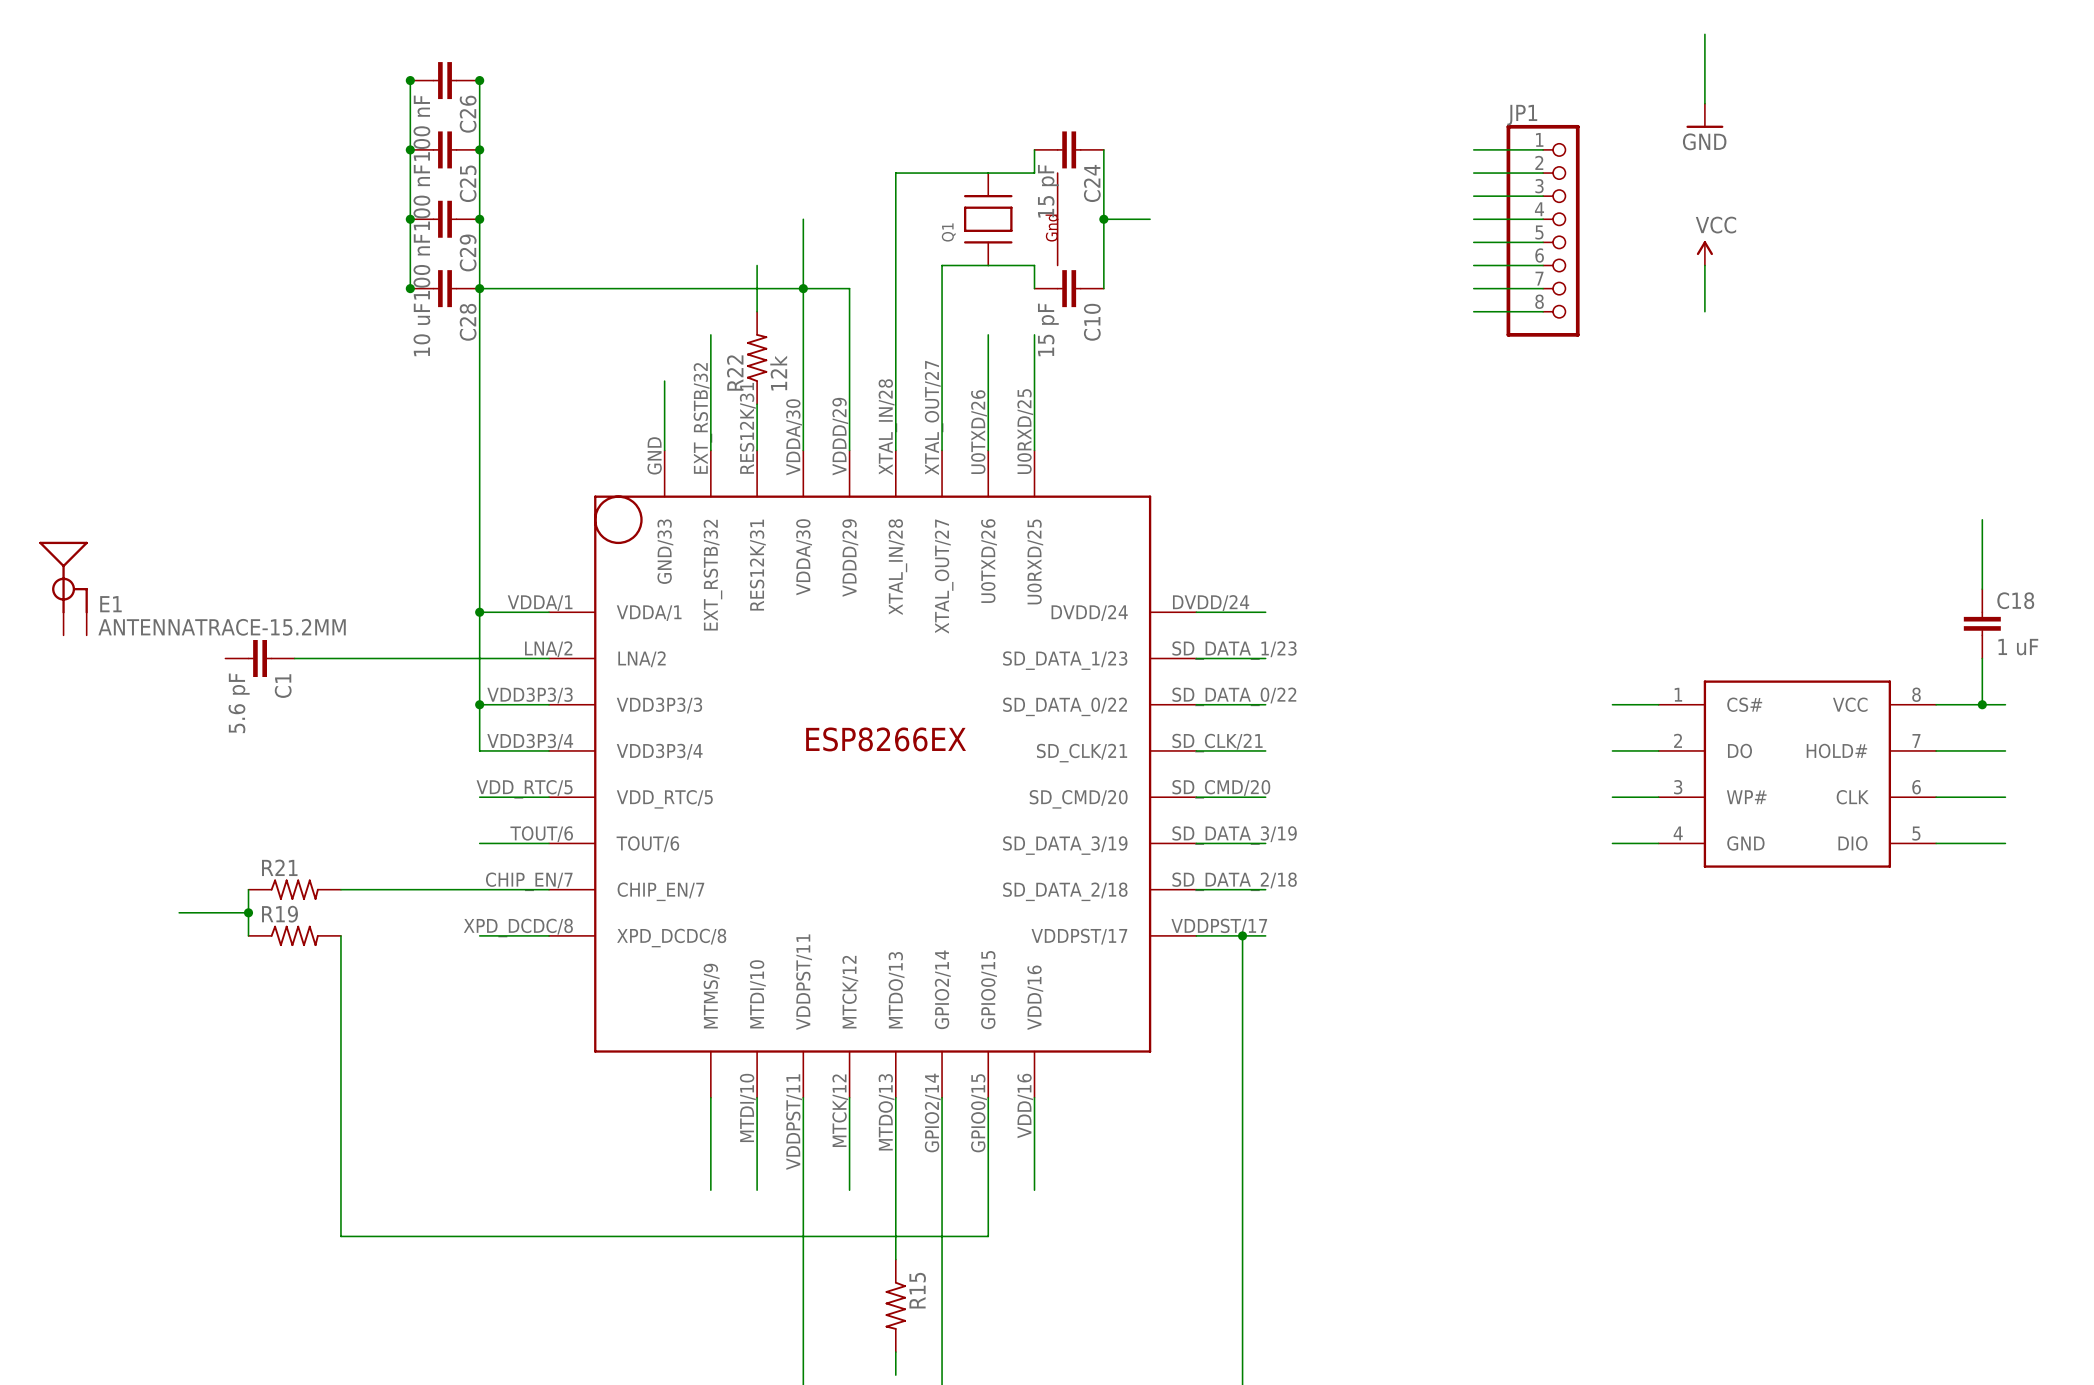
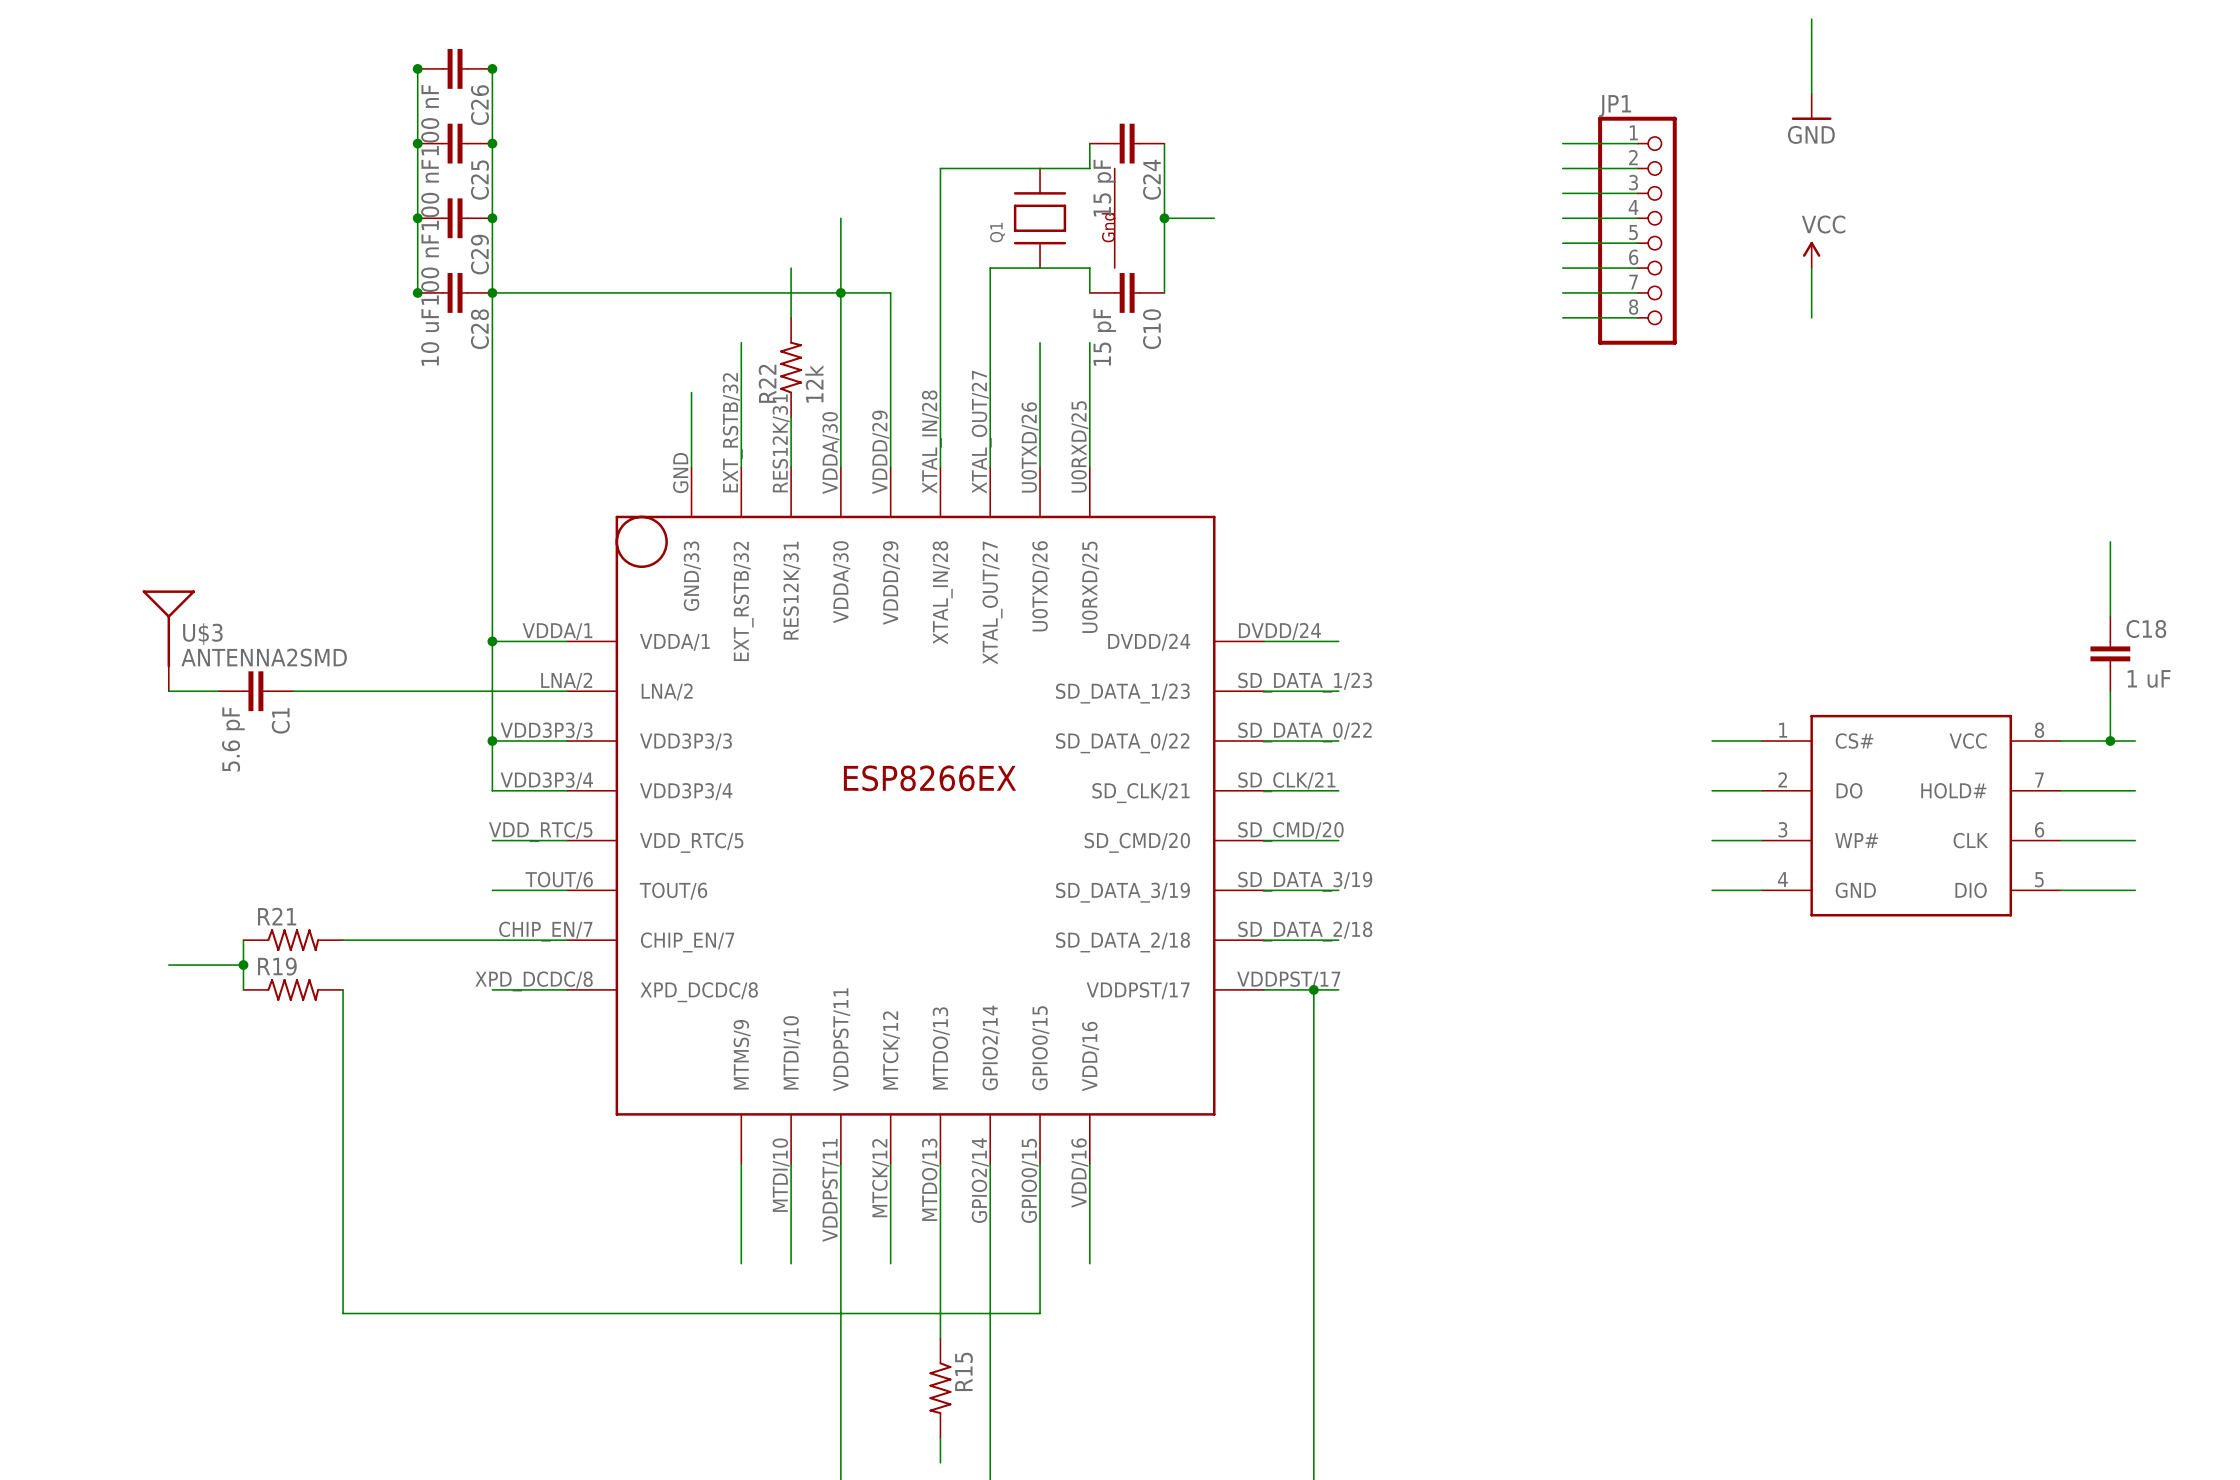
E1: ANTENNATRACE-15.2MM (63, 588) -> none
U$3: none -> ANTENNA2SMD (168, 640)
wire: none -> (168, 691) (218, 691)

